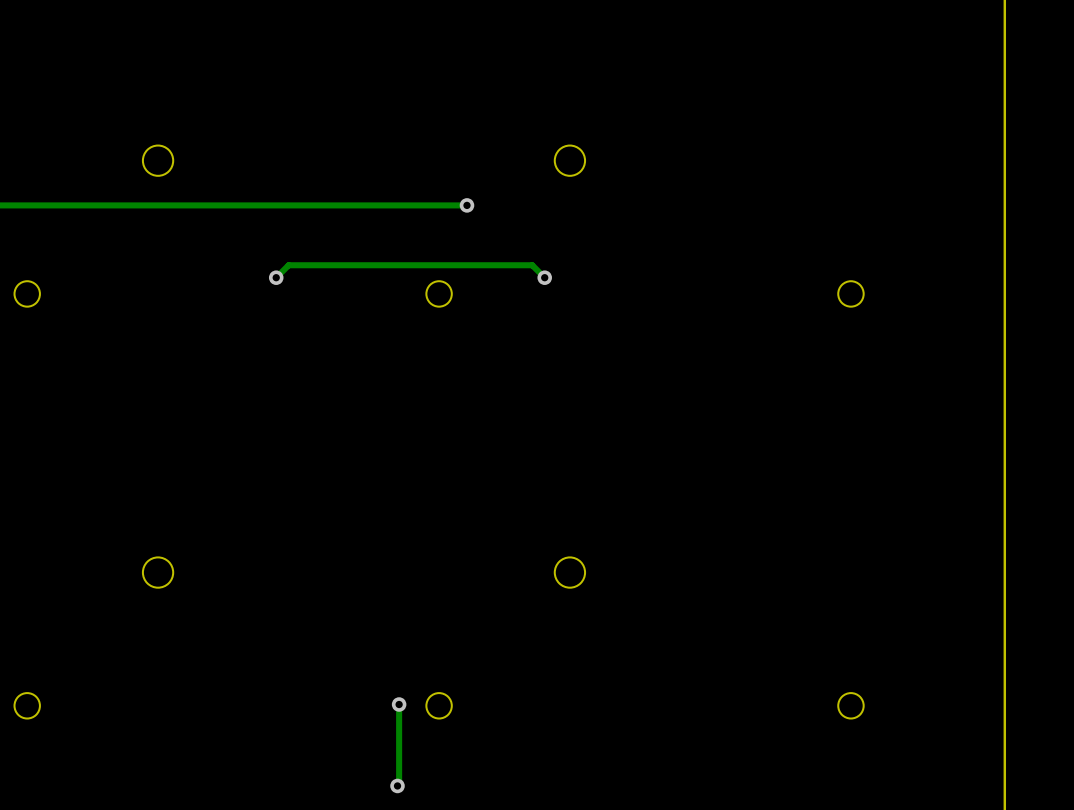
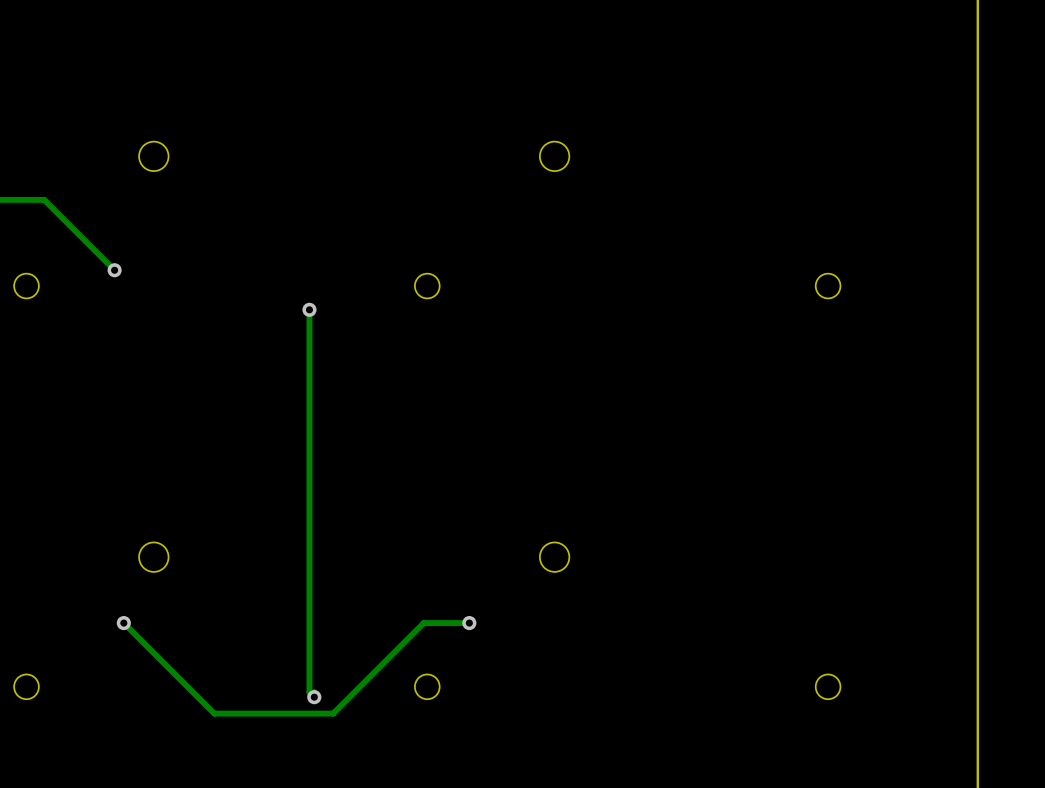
track: (467, 205) (45, 205) -> (114, 270) (44, 199)
via: (467, 205) -> none
via: none -> (114, 270)
via position: (276, 277) -> (309, 309)
track: (544, 277) (532, 265) (288, 265) (276, 277) -> none
via: (544, 277) -> none
track: none -> (309, 309) (309, 692) (314, 697) (314, 692)
via: none -> (123, 623)
track: none -> (469, 623) (423, 623) (333, 713) (214, 713) (123, 623)
via: none -> (469, 623)
track: (399, 704) (399, 784) (397, 785) -> none
via: (399, 704) -> none
via: none -> (314, 697)
via: (397, 785) -> none

